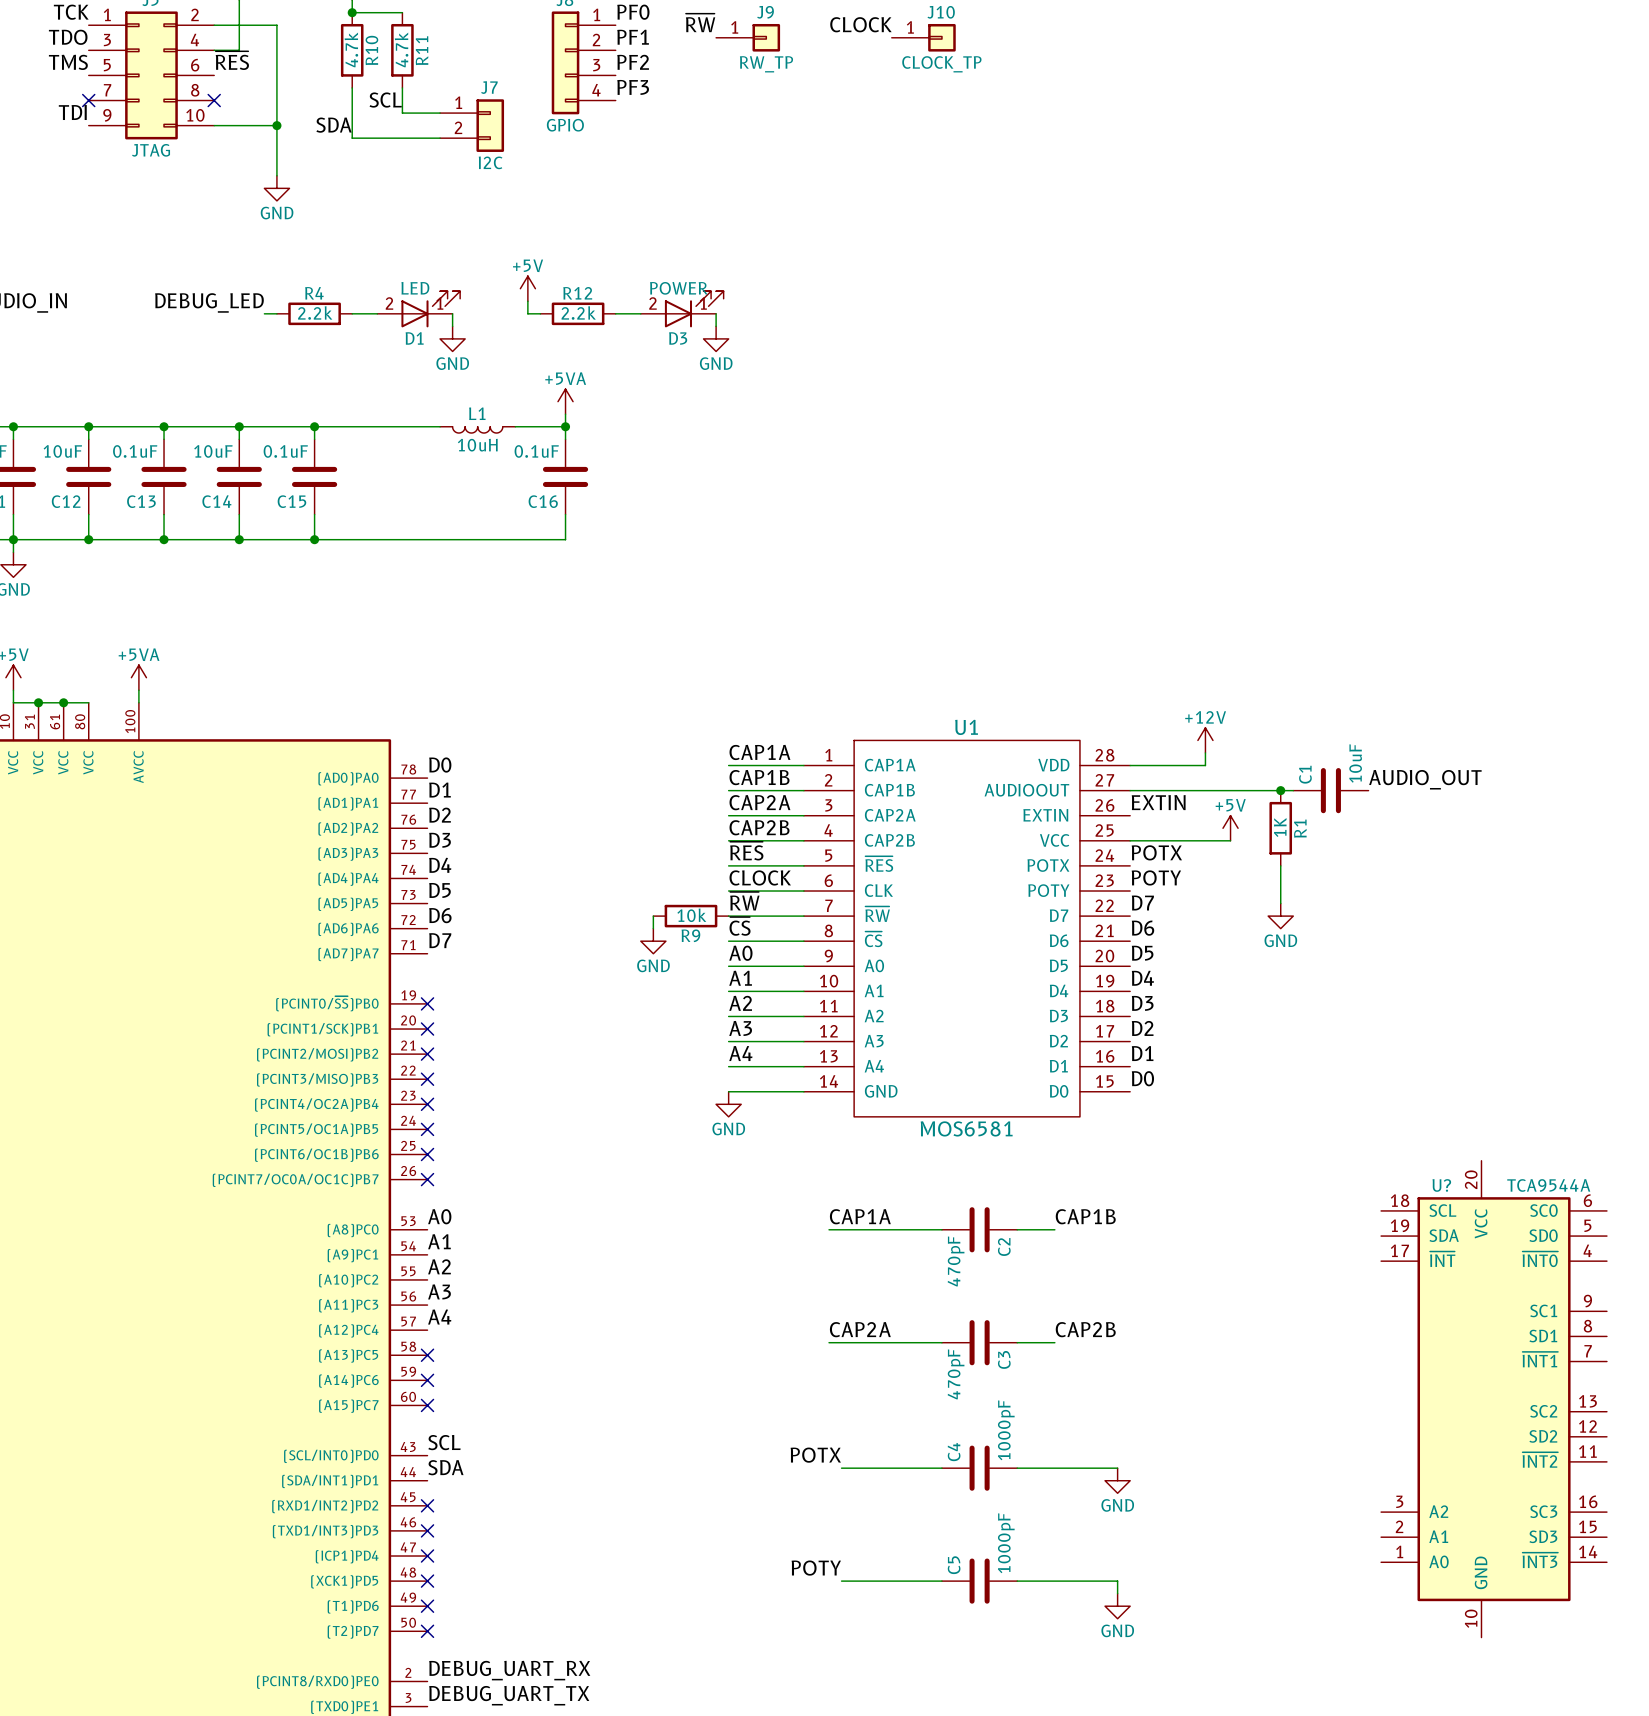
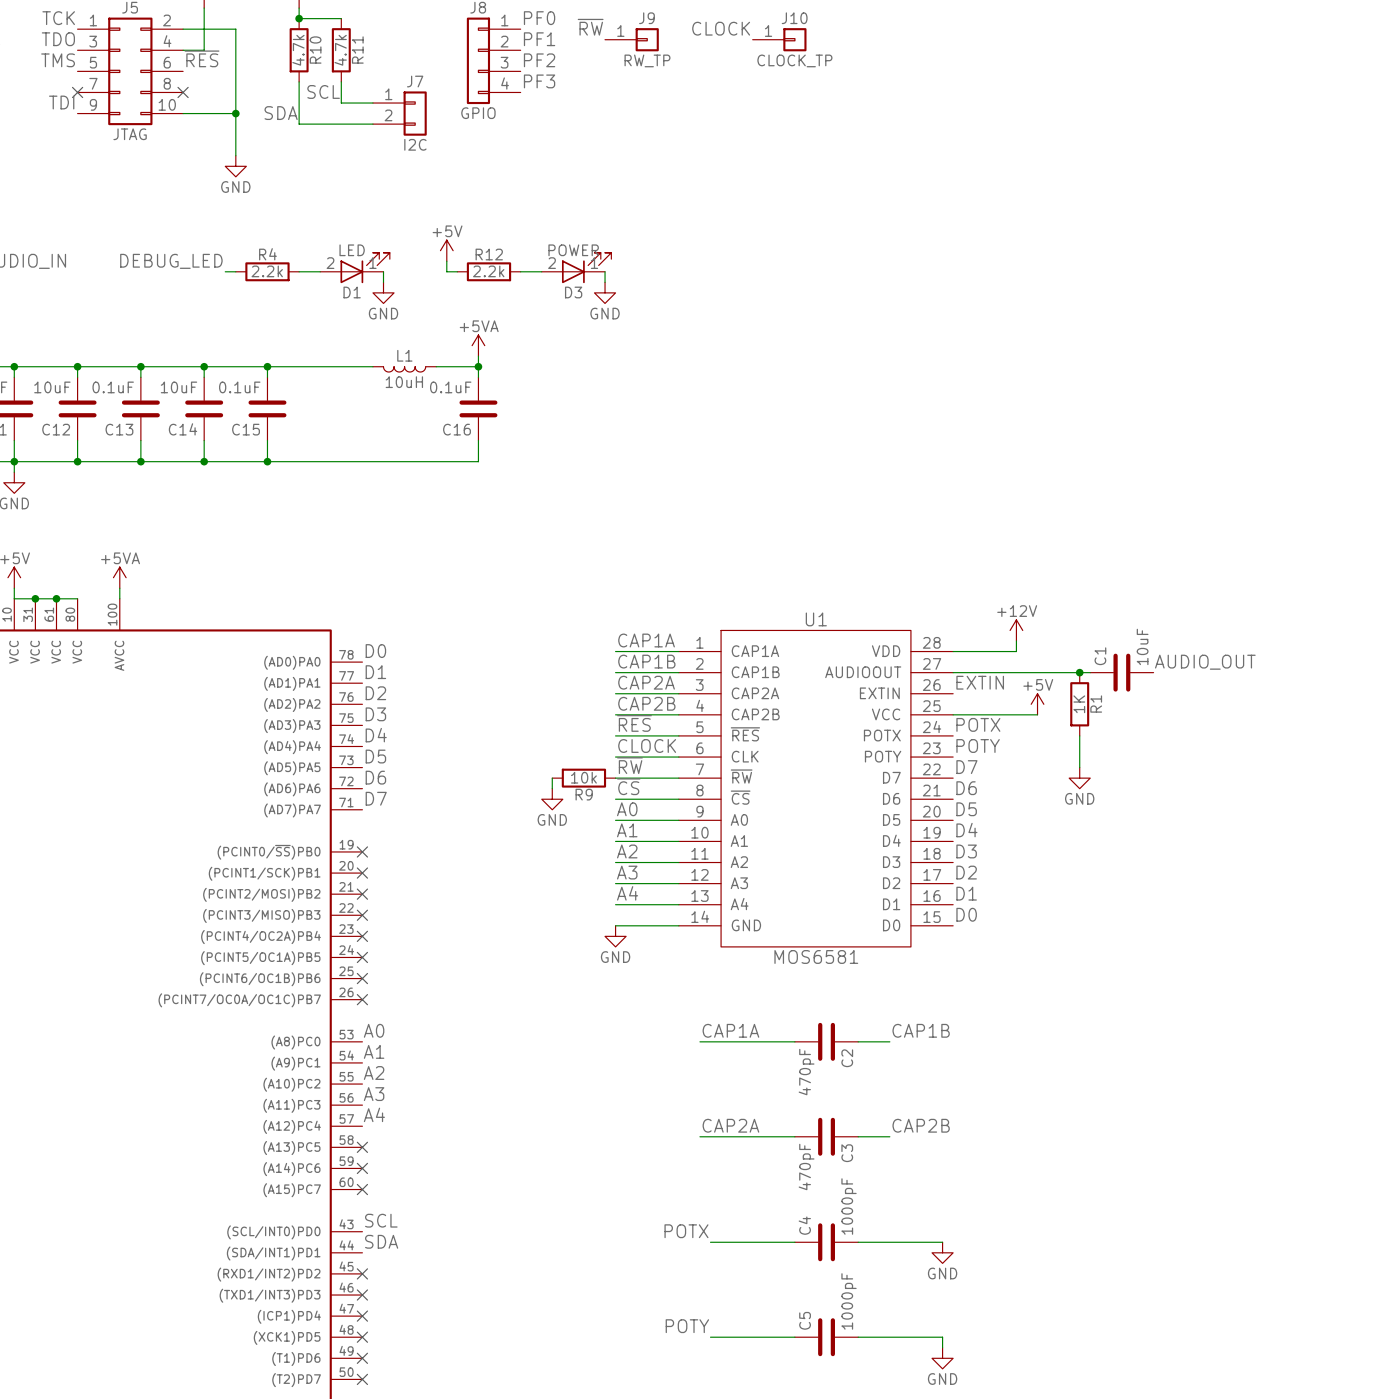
U?: TCA9544A (1494, 1399) -> none

